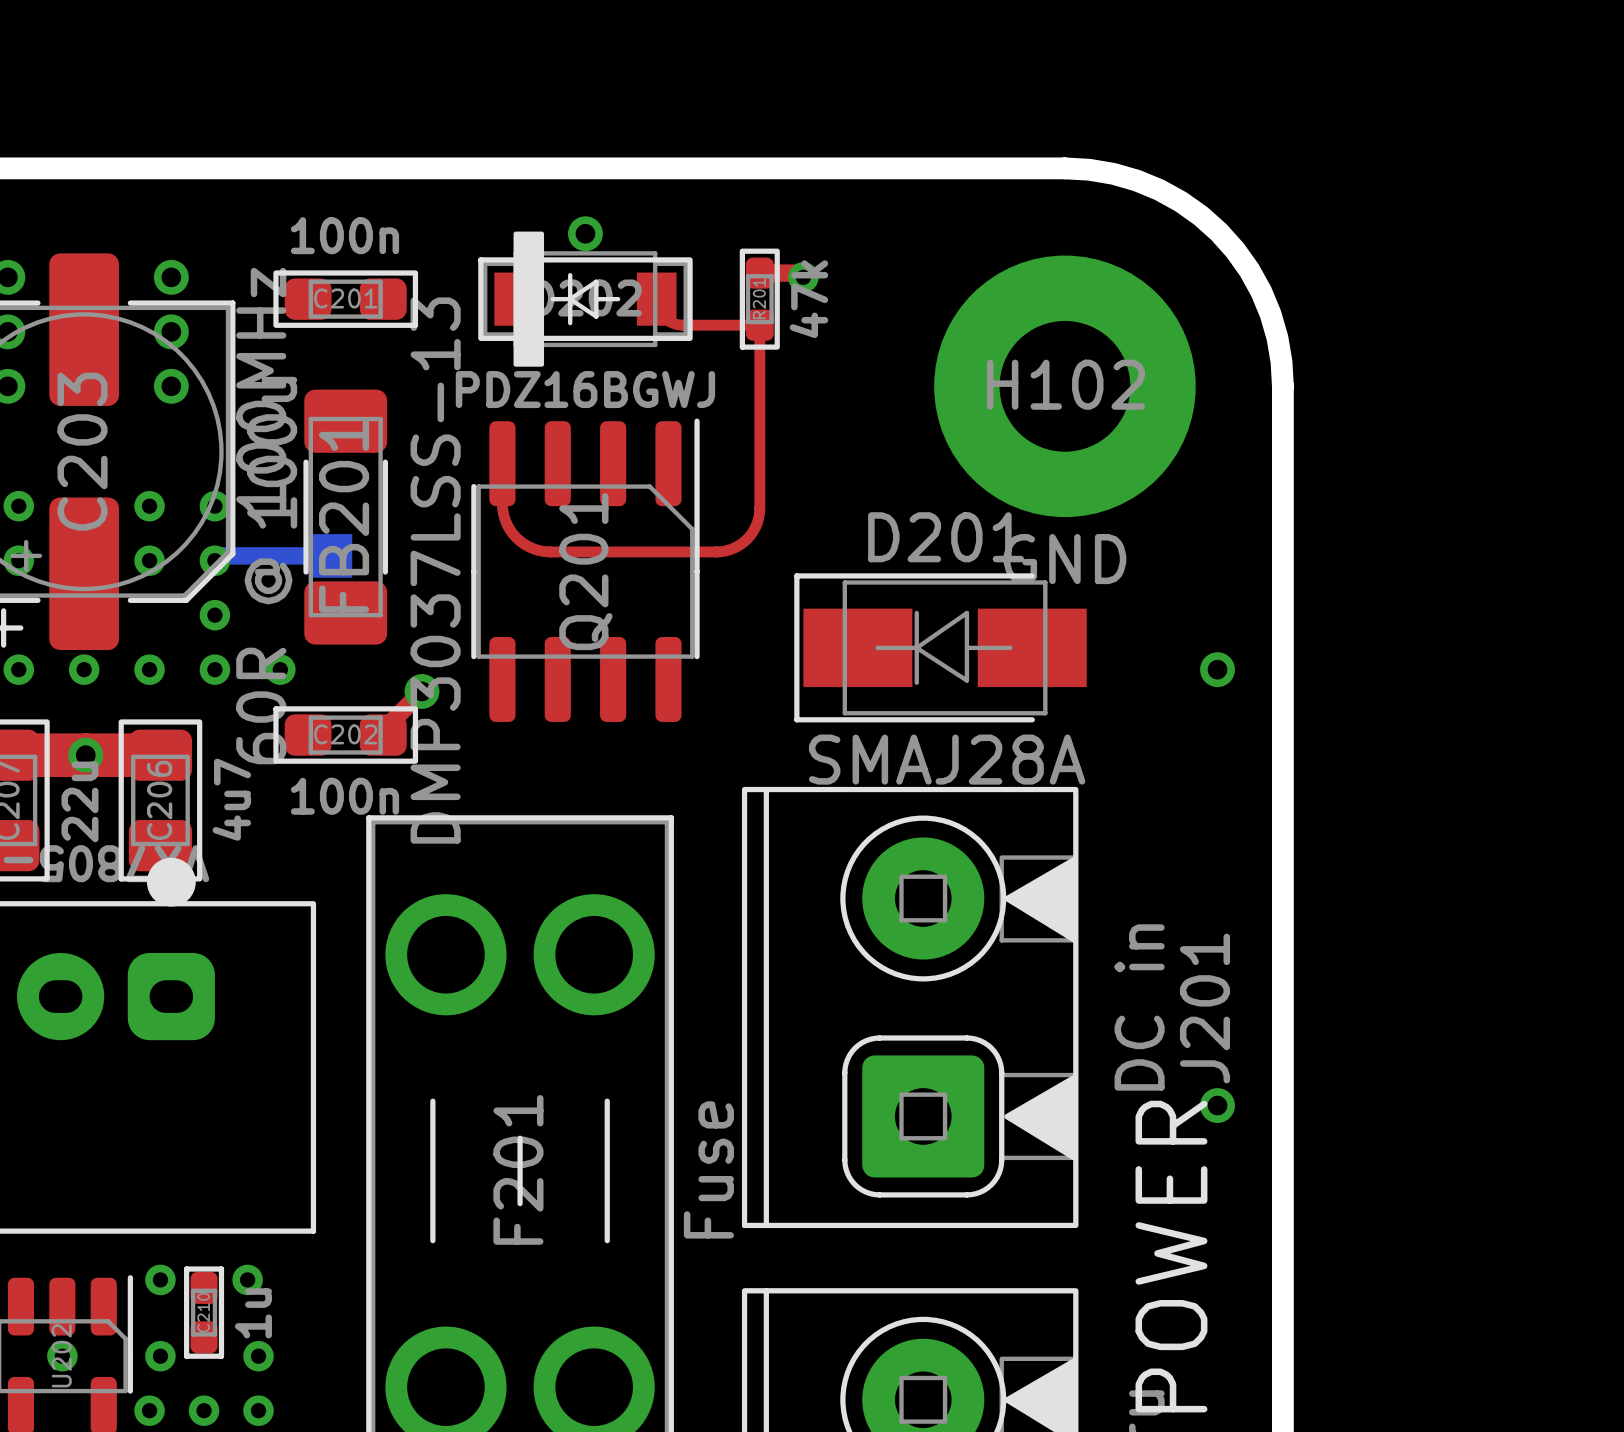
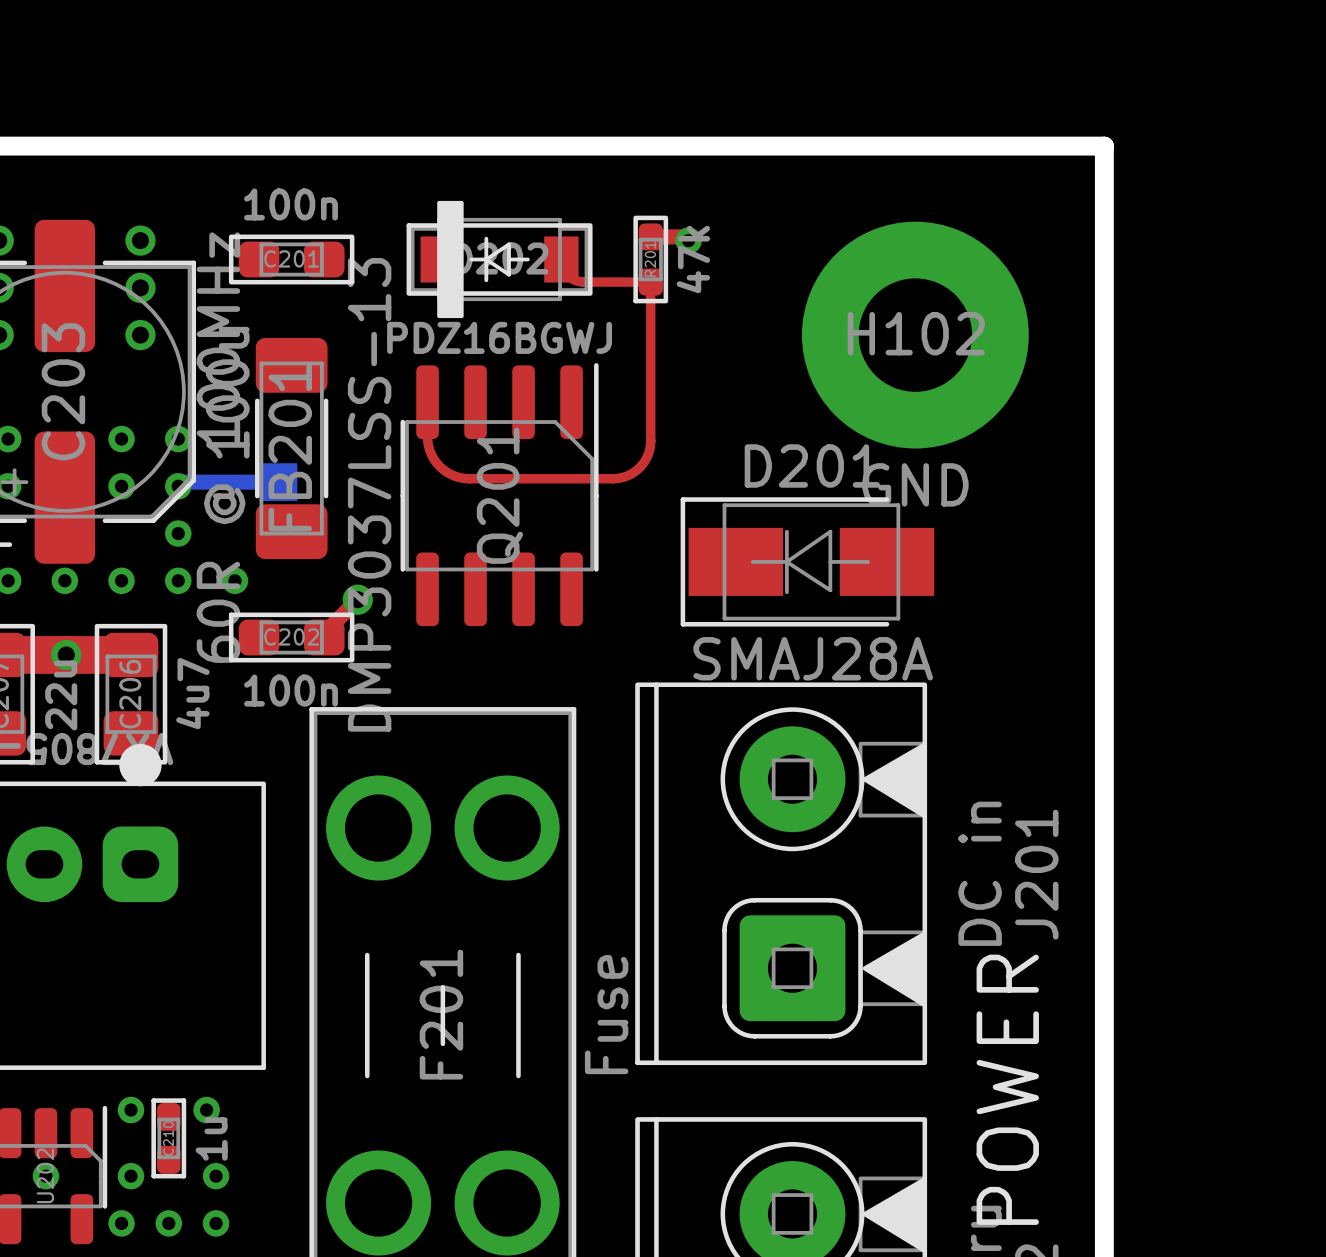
board edge: (1064, 168) (1113, 173) (1159, 189) (1200, 215) (1219, 232) (1249, 270) (1261, 291) (1277, 337) (1282, 386) -> (915, 146) (1104, 146) (1104, 335)
via: (585, 233) -> none
via: (1217, 669) -> none
via: (1217, 1105) -> none

